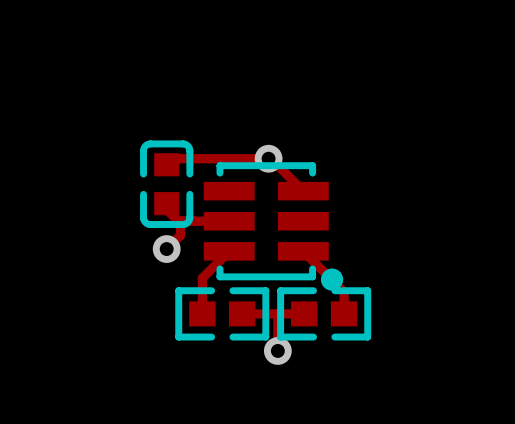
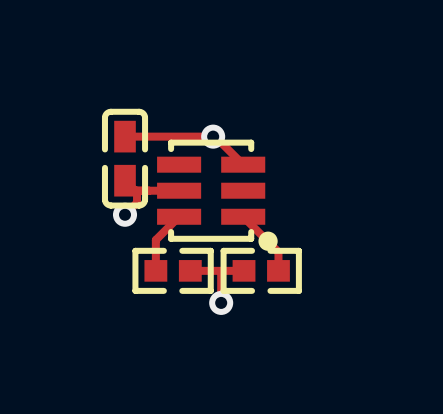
part footprint: [140, 140, 194, 228] -> [101, 108, 149, 209]

